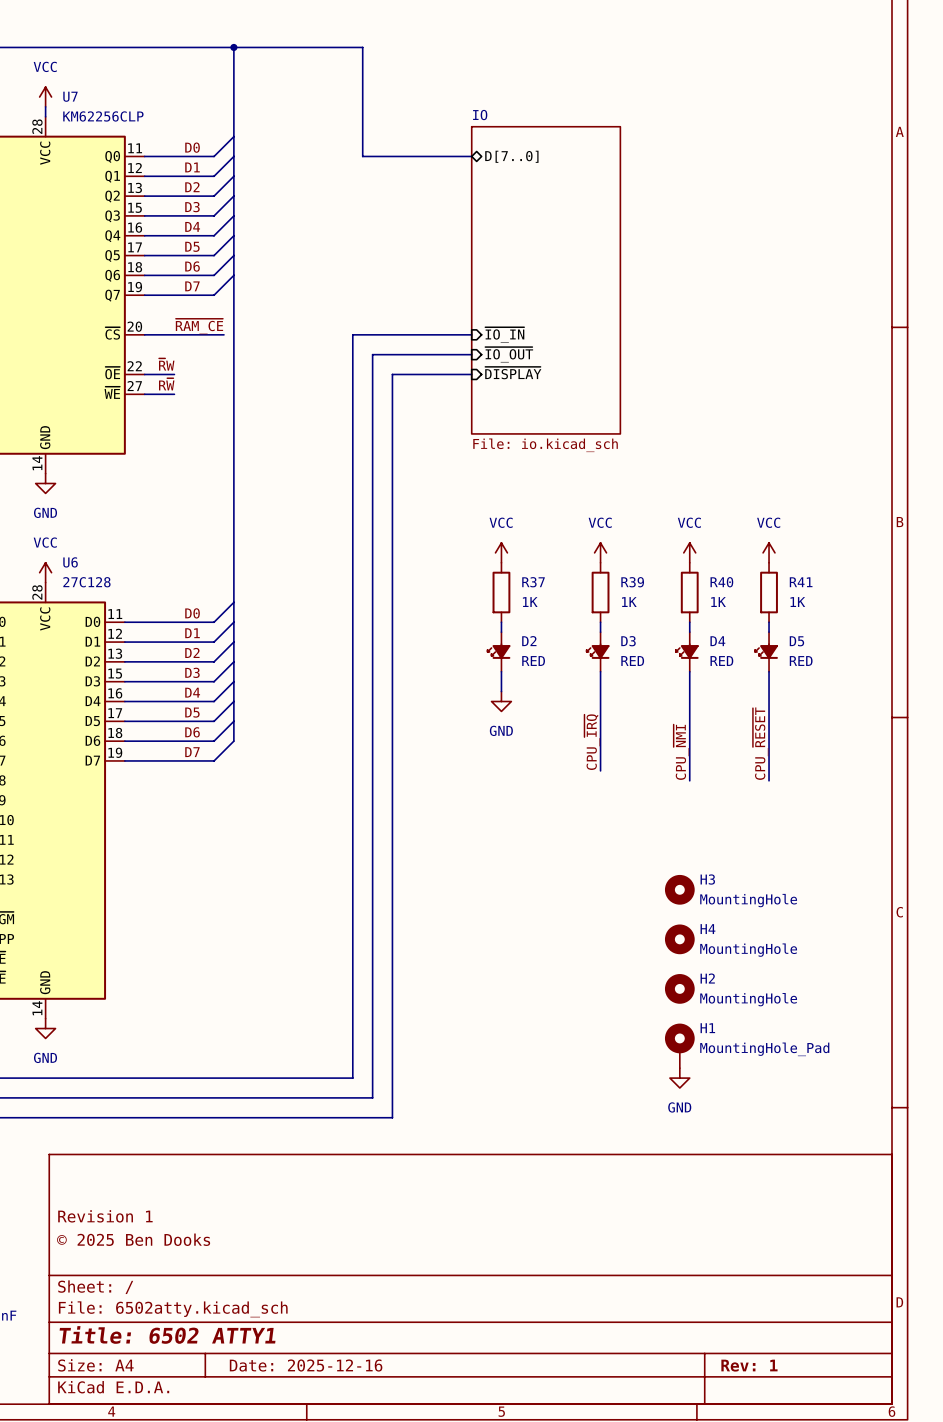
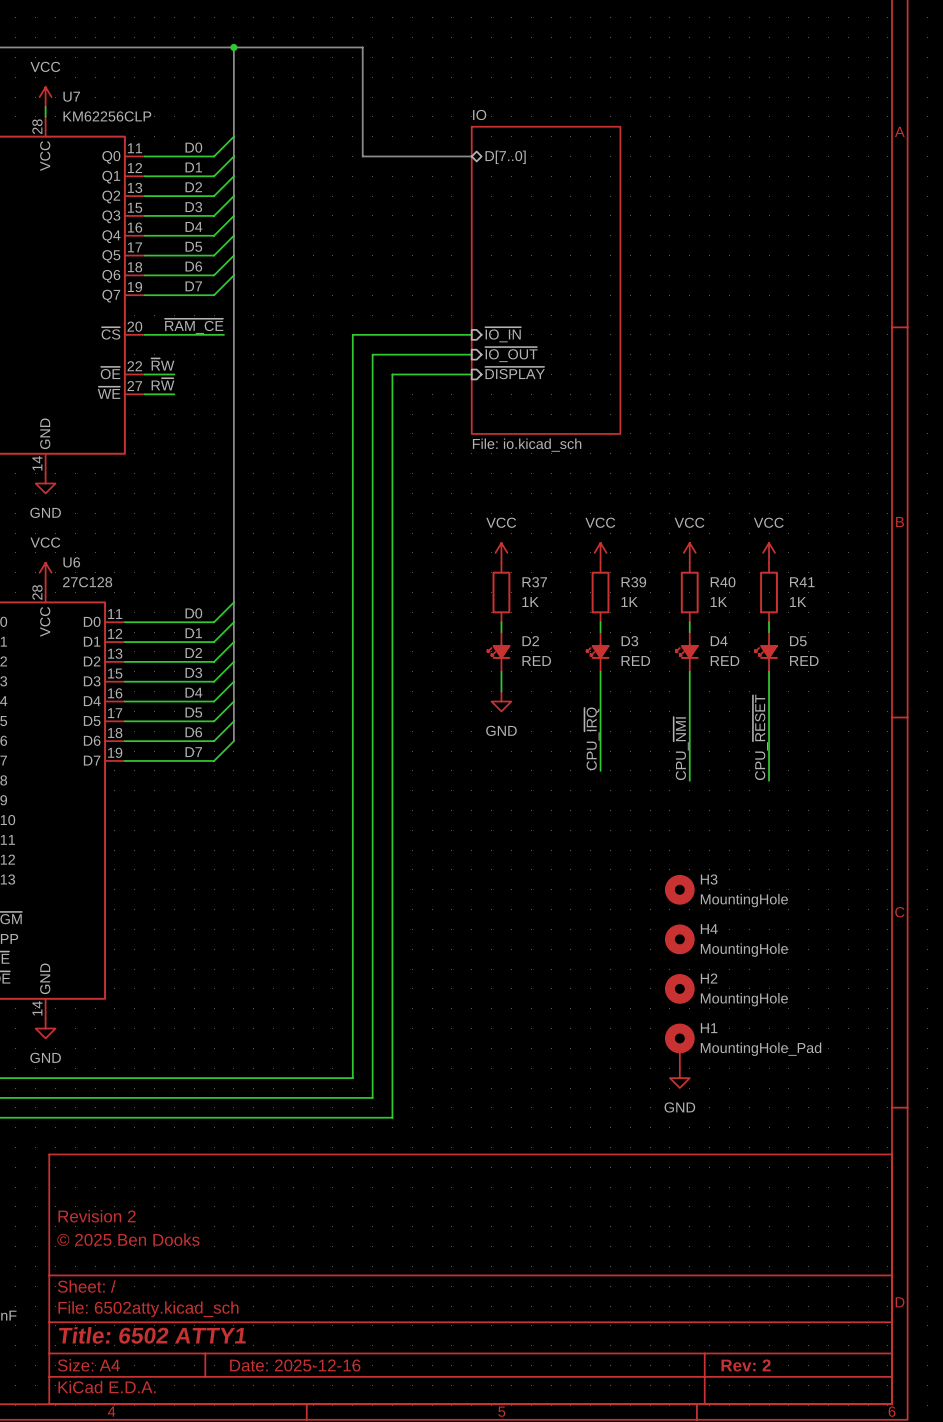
title block: Revision 1 (105, 1216) -> Revision 2 (97, 1216)
title block: Rev: 1 (749, 1365) -> Rev: 2 (746, 1365)

